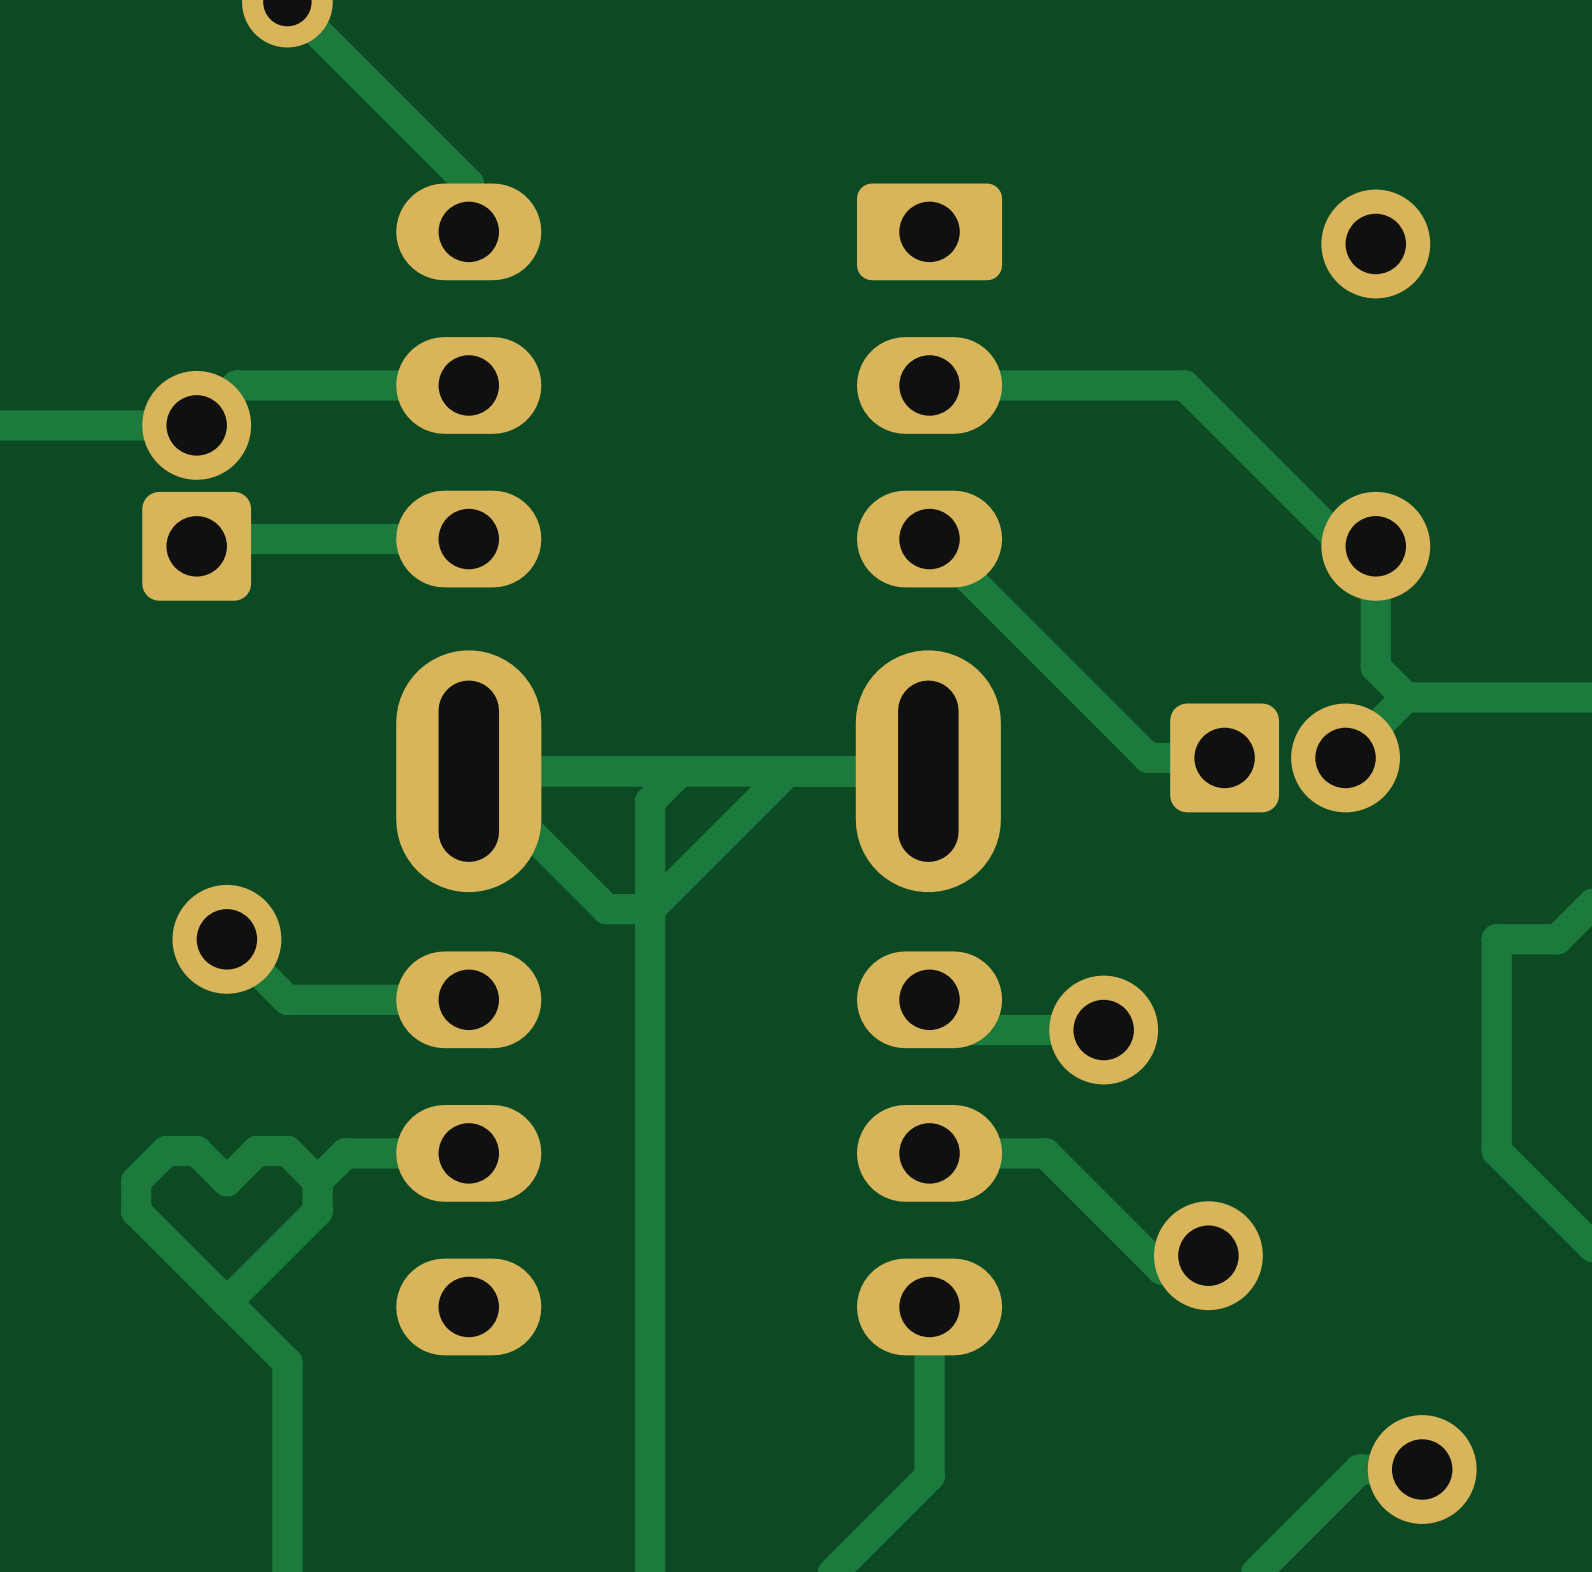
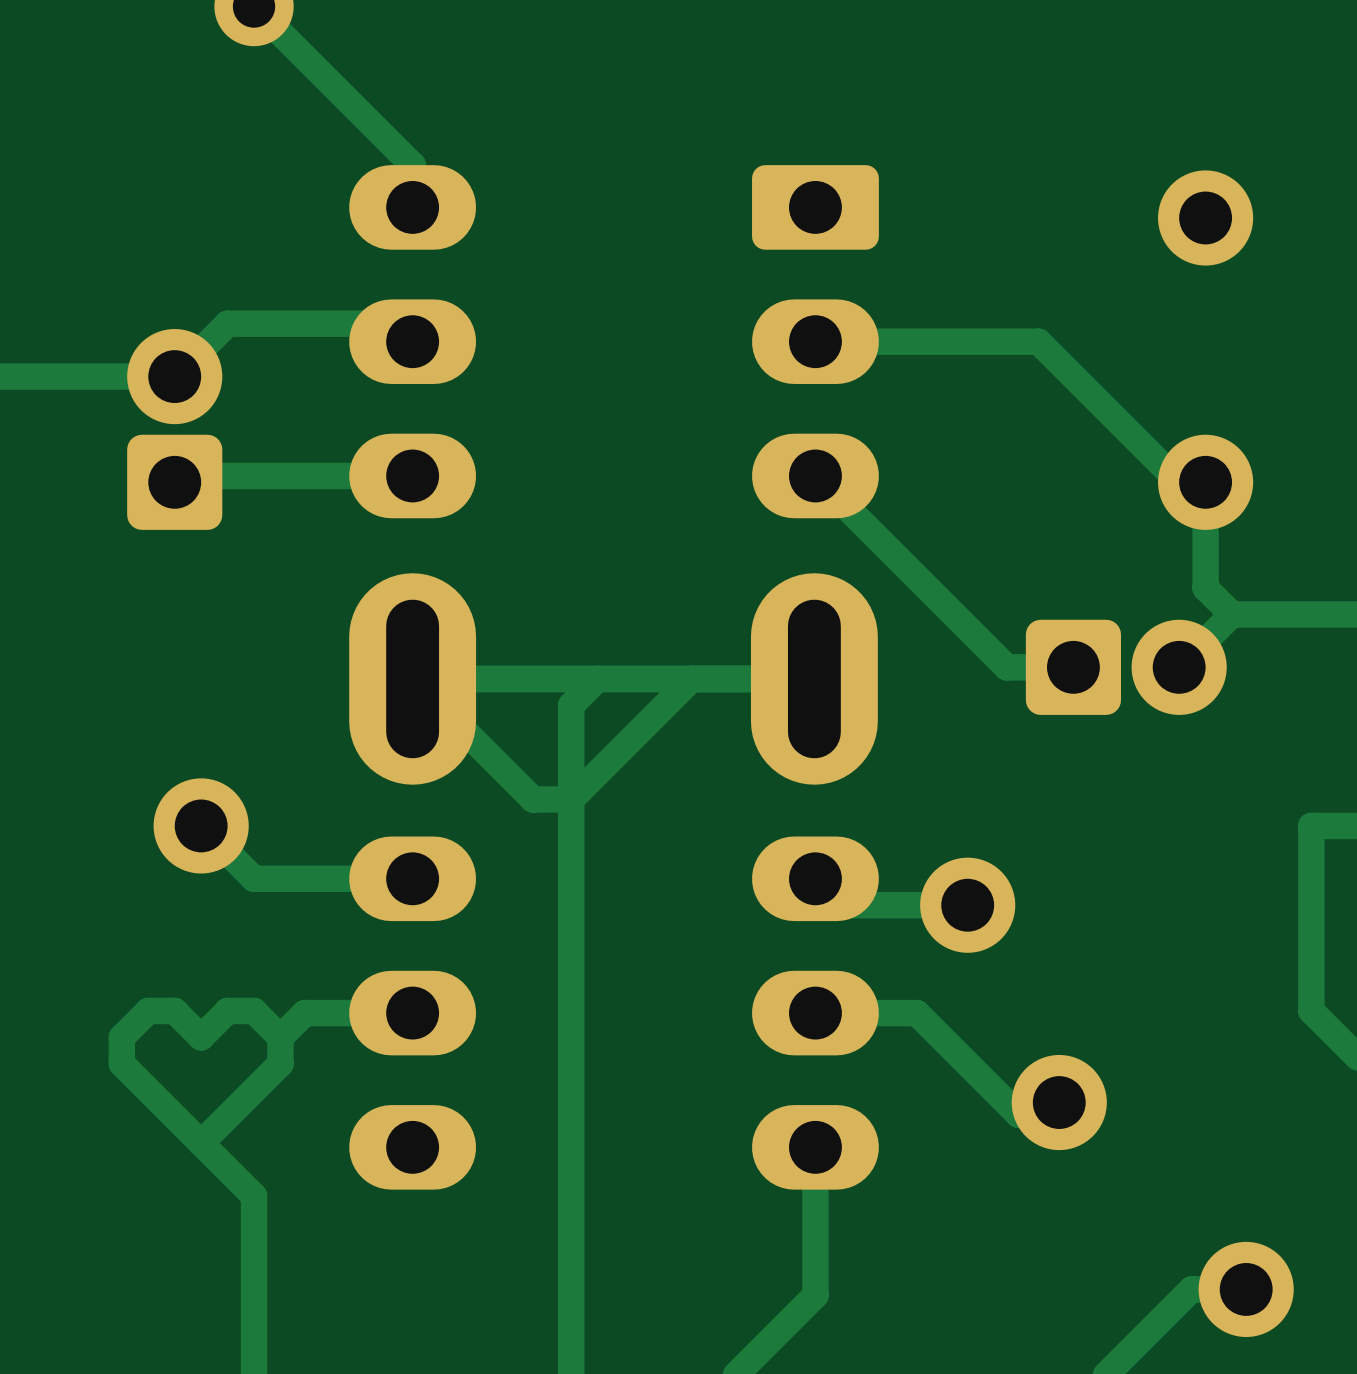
track: (468, 385) (236, 385) -> (412, 341) (394, 323) (227, 323) (209, 341)

